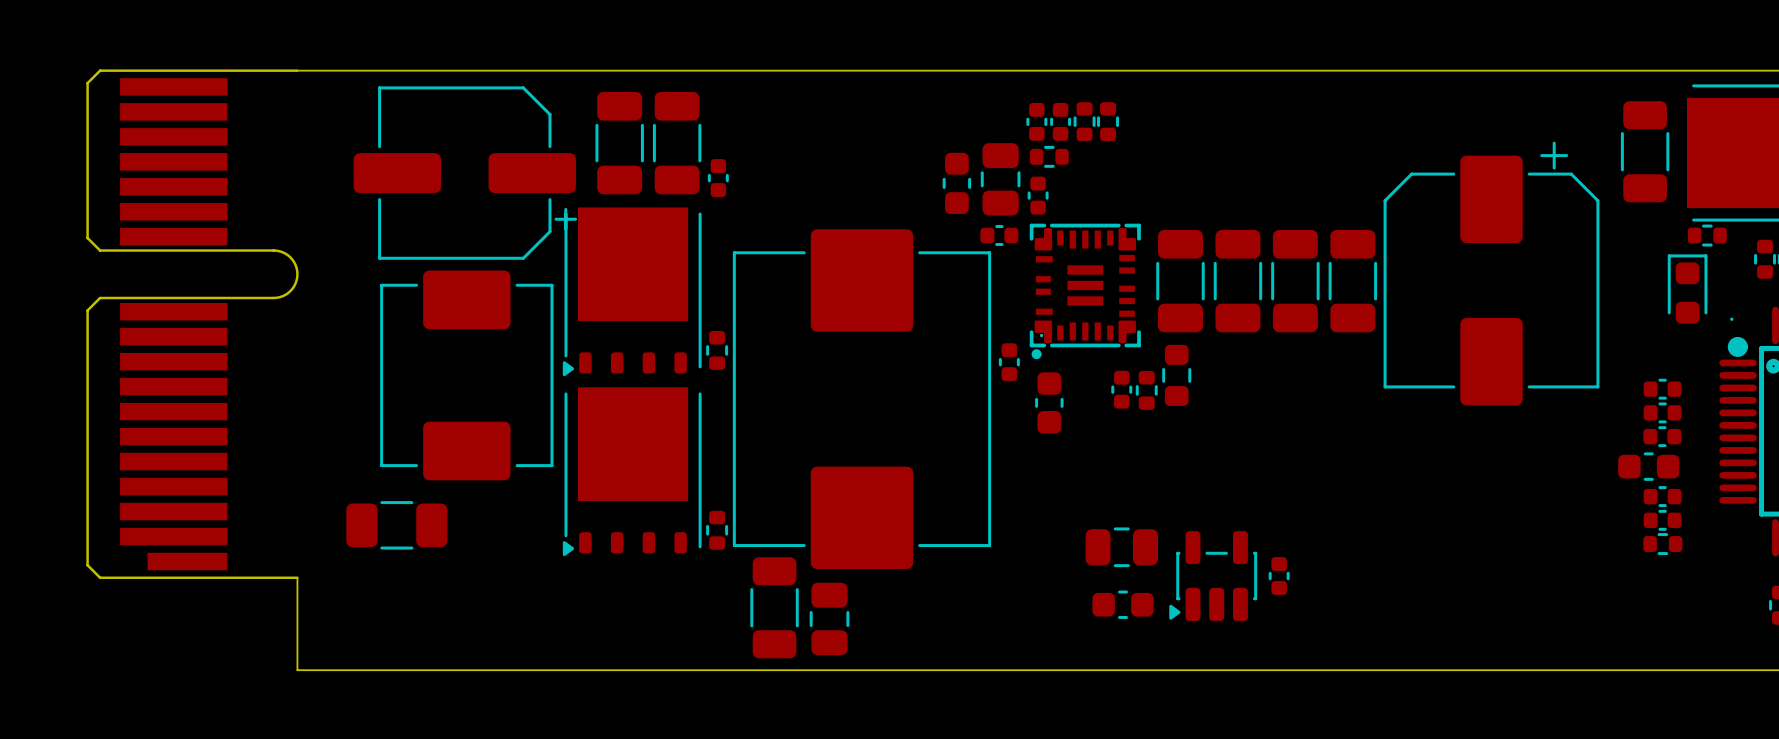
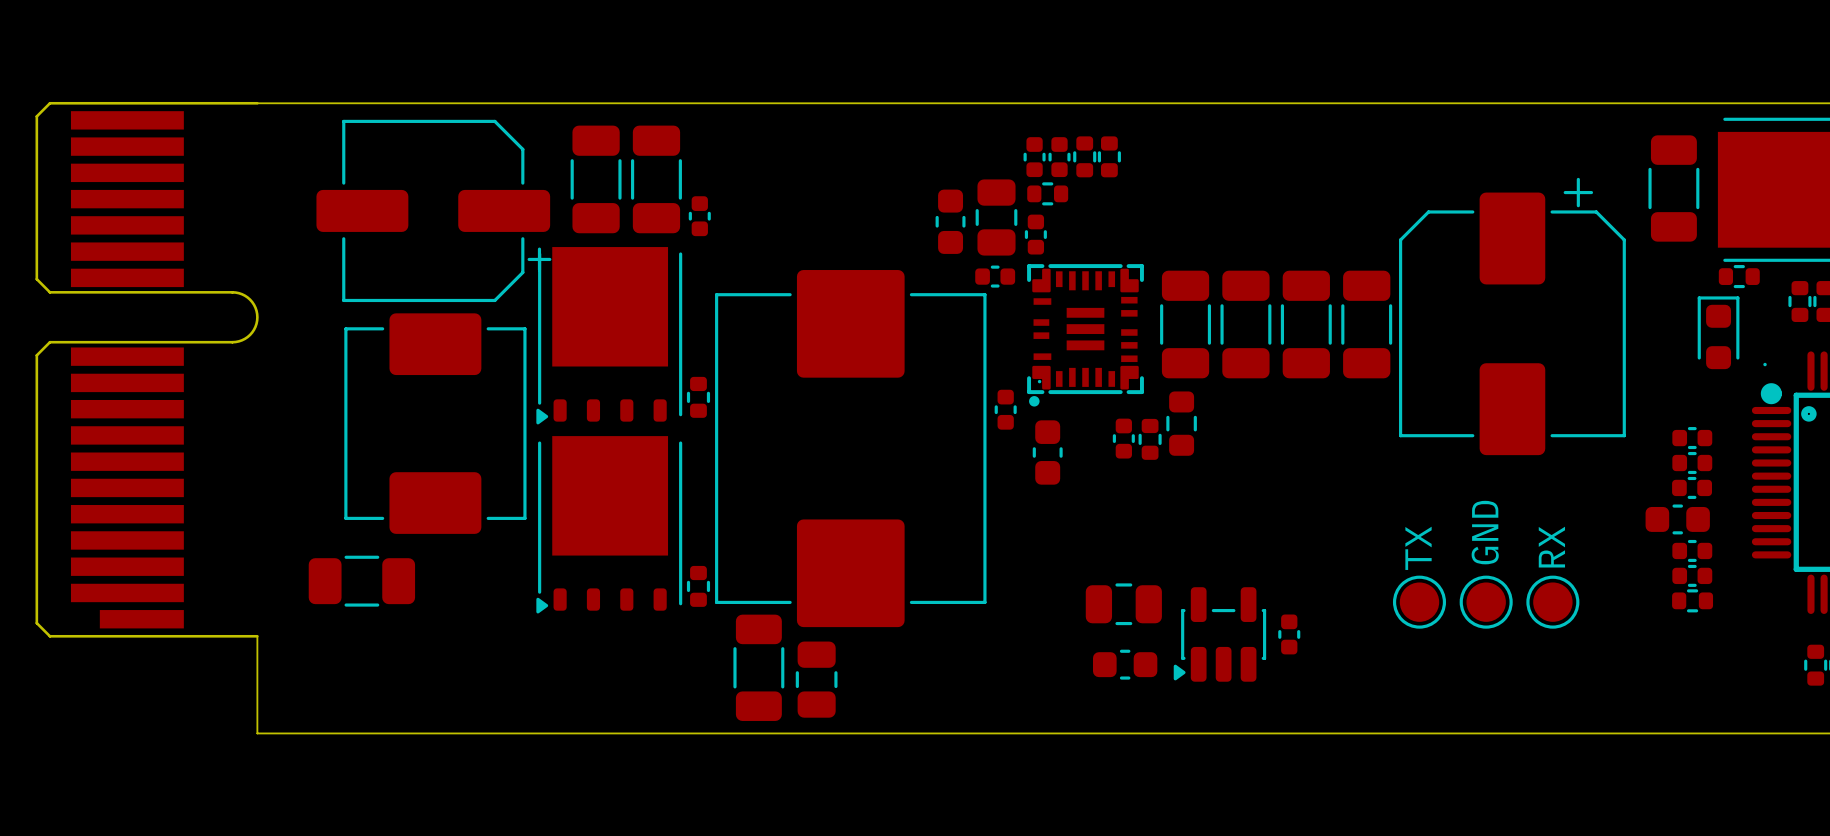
part: none -> TX (1419, 602)
part: none -> GND (1486, 602)
part: none -> RX (1552, 602)

